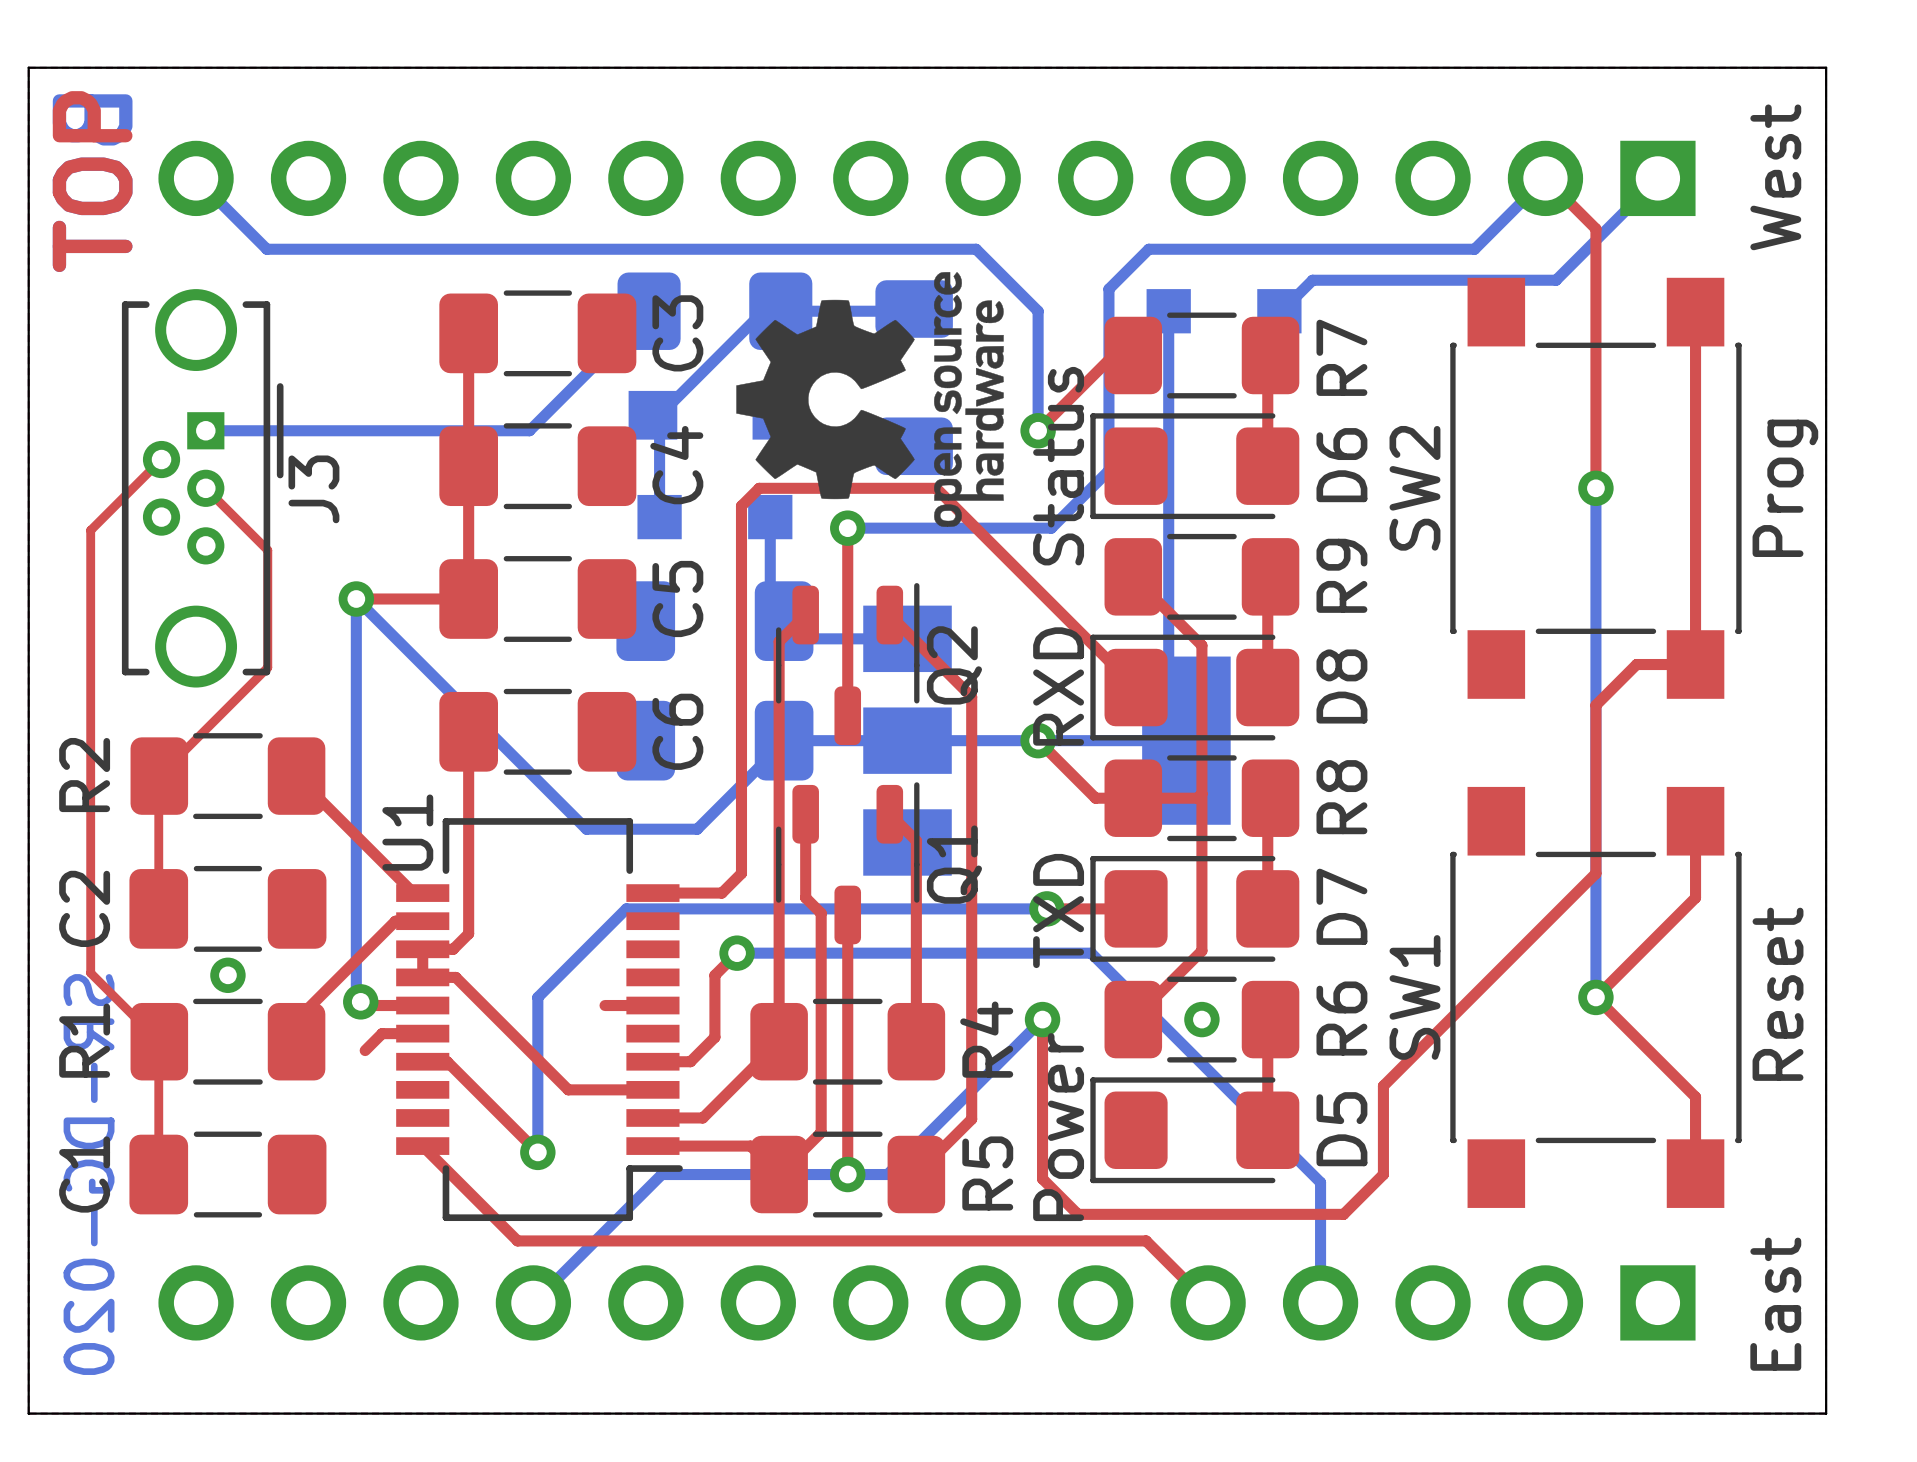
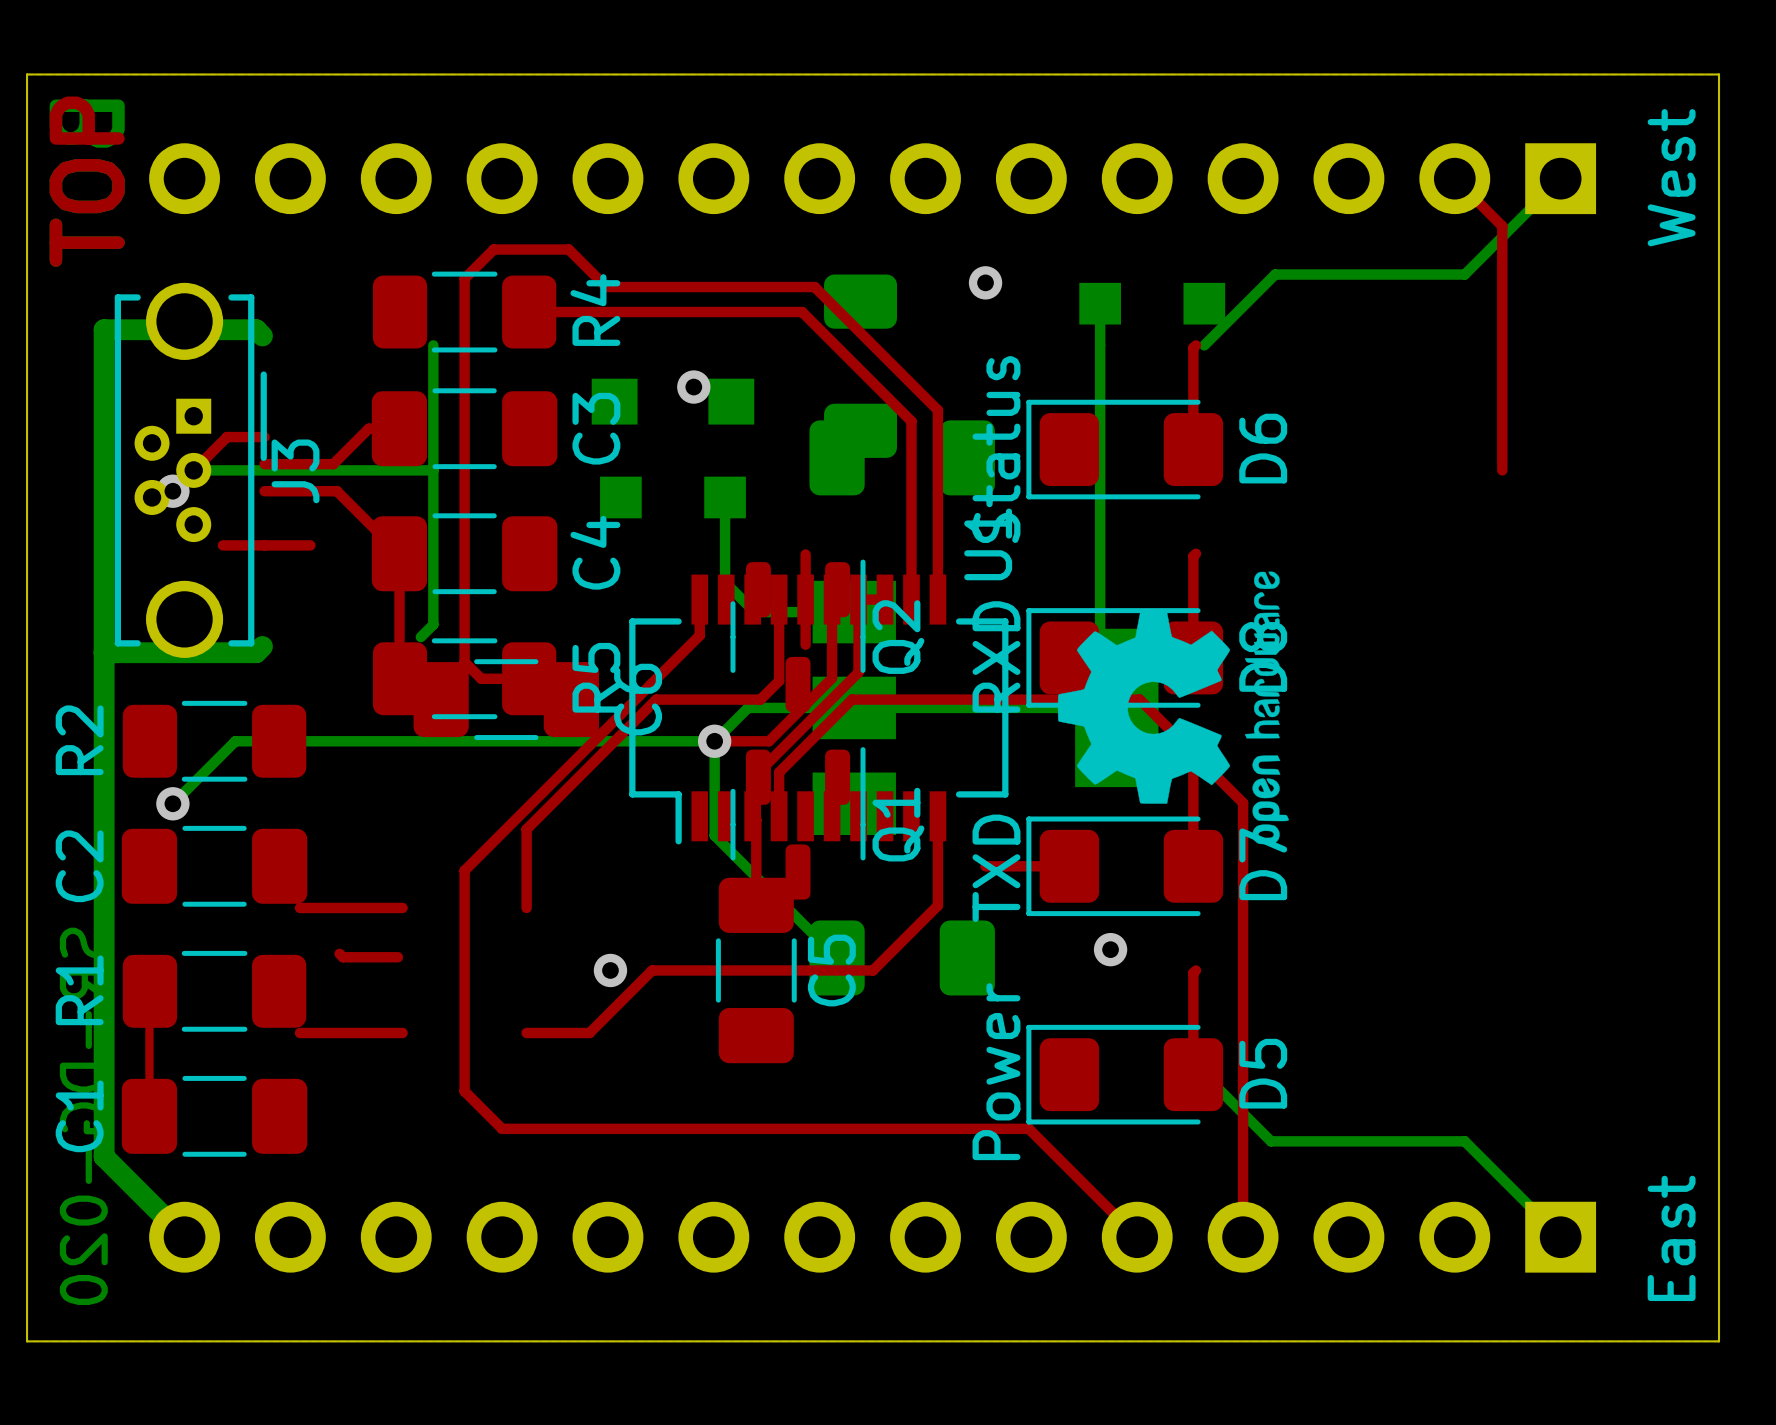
bottom track: (196, 178) (266, 249) (976, 249) (1038, 311) (1038, 430) -> none
bottom track: (1545, 178) (1474, 249) (1148, 249) (1108, 289) (1108, 470) (1051, 528) (847, 528) -> none
drawing: [736, 272, 1004, 527] -> none
bottom track: (1354, 280) (1312, 280) (1281, 311) (1279, 311) -> (1275, 274) (1204, 345)
bottom track: (649, 311) (529, 430) (205, 430) -> none
part: (714, 311) -> none
bottom track: (911, 311) (763, 311) (659, 415) (659, 517) -> none
top track: (1695, 312) (1695, 664) (1636, 664) (1595, 705) (1595, 873) (1383, 1085) (1383, 1174) (1343, 1214) (1077, 1214) (1042, 1178) (1042, 1019) -> none
top track: none -> (529, 312) (802, 312) (911, 421) (911, 599)
top track: (468, 333) (468, 598) (356, 598) -> none
C3 position: (537, 333) -> (464, 428)
bottom track: none -> (262, 335) (256, 329) (104, 329) (104, 1156) (184, 1237)
bottom track: none -> (433, 345) (433, 624) (420, 637)
top track: (1133, 355) (1113, 355) (1038, 430) -> none
R7: (1201, 355) -> none
via: none -> (693, 387)
via position: (1038, 430) -> (985, 282)
top track: none -> (399, 428) (368, 428) (333, 464) (264, 464)
top track: none -> (264, 437) (227, 437) (172, 491)
top track: (161, 459) (90, 530) (90, 973) (159, 1041) -> none
C4 position: (537, 466) -> (464, 553)
part: none -> (902, 457)
top track: (205, 488) (267, 550) (267, 667) (158, 776) (158, 908) -> none
bottom track: none -> (433, 470) (193, 470) (172, 491)
bottom track: (1595, 488) (1595, 997) -> none
SW2: Prog (1595, 488) -> none
via: (1595, 488) -> none
via: none -> (172, 491)
top track: none -> (264, 491) (336, 491) (399, 553) (399, 678)
top track: (847, 528) (847, 715) -> none
via: (847, 528) -> none
top track: none -> (222, 545) (310, 545)
top track: (1133, 576) (1201, 645) (1201, 950) (1133, 1019) -> none
R9: (1201, 576) -> none
top track: none -> (805, 554) (805, 644)
drawing: none -> [1057, 571, 1289, 845]
via: (356, 598) -> none
C5 rotation: 0° (537, 598) -> 90° clockwise (756, 970)
C5 position: (537, 598) -> (756, 970)
top track: (805, 615) (779, 641) (779, 1041) (702, 1117) (652, 1117) -> none
top track: (889, 615) (971, 696) (971, 1119) (916, 1174) -> none
part: (714, 621) -> none
top track: none -> (779, 599) (779, 680) (760, 699) (656, 699) (526, 829) (526, 907)
top track: none -> (832, 599) (832, 678) (769, 741) (714, 741)
top track: none -> (885, 599) (858, 599) (858, 672) (752, 778) (752, 816) (756, 819) (756, 905)
top track: none -> (937, 599) (937, 410) (814, 287) (606, 287) (568, 249) (493, 249) (464, 278) (464, 662) (481, 678) (529, 678)
bottom track: none -> (262, 646) (256, 652) (104, 652)
top track: (1135, 687) (936, 488) (759, 488) (741, 506) (741, 873) (721, 893) (652, 893) -> none
top track: (468, 731) (468, 933) (453, 949) (422, 949) (422, 977) (455, 977) (568, 1089) (652, 1089) -> none
part: (714, 740) -> none
bottom track: (794, 740) (784, 740) (697, 829) (586, 829) (356, 598) (356, 997) (360, 1001) -> (747, 707) (714, 741)
top track: (1038, 740) (1095, 798) (1197, 798) (1201, 793) -> none
via: (1038, 740) -> none
top track: (296, 776) (413, 893) (422, 893) -> none
bottom track: none -> (714, 741) (714, 835) (837, 957)
bottom track: none -> (714, 741) (235, 741) (172, 803)
via: none -> (714, 741)
R8: (1201, 798) -> none
top track: (805, 814) (805, 897) (821, 913) (821, 1132) (779, 1174) (750, 1146) (652, 1146) -> none
top track: (889, 814) (916, 840) (916, 1041) -> none
top track: (1695, 821) (1695, 897) (1595, 997) (1695, 1097) (1695, 1173) -> none
via: none -> (172, 803)
top track: none -> (779, 816) (779, 772) (851, 699) (1139, 699) (1243, 802) (1243, 1237)
top track: none -> (937, 816) (937, 905) (873, 970) (652, 970) (589, 1032) (526, 1032)
bottom track: (1046, 908) (626, 908) (537, 997) (537, 1152) -> none
via: (1046, 908) -> none
top track: (847, 914) (847, 1174) -> none
top track: (422, 921) (395, 921) (296, 1020) (296, 1041) -> none
top track: none -> (300, 907) (402, 907)
top track: (737, 953) (714, 975) (714, 1037) (690, 1061) (652, 1061) -> none
bottom track: (737, 953) (1091, 953) (1320, 1182) (1320, 1302) -> none
via: (737, 953) -> none
via: (227, 975) -> none
SW1: Reset (1595, 997) -> none
via: (1595, 997) -> none
via: (360, 1001) -> none
top track: (605, 1005) (652, 1005) -> none
part: none -> (902, 957)
U1 rotation: 0° (539, 1019) -> 90° clockwise (818, 709)
U1 position: (539, 1019) -> (818, 709)
via: none -> (610, 970)
bottom track: (1042, 1019) (887, 1174) (661, 1174) (537, 1298) -> none
via: (1042, 1019) -> none
R6: (1201, 1019) -> none
via position: (1201, 1019) -> (1110, 949)
top track: (422, 1033) (382, 1033) (365, 1050) -> none
R4 position: (847, 1041) -> (464, 312)
top track: (422, 1061) (447, 1061) (537, 1152) -> none
top track: none -> (300, 1032) (402, 1032)
bottom track: none -> (1204, 1074) (1271, 1141) (1464, 1141) (1560, 1237)
top track: (422, 1146) (517, 1240) (1146, 1240) -> (699, 599) (699, 635) (464, 870) (464, 1091) (502, 1128) (1028, 1128) (1078, 1178)
via: (537, 1152) -> none
R5 position: (847, 1174) -> (464, 678)
via: (847, 1174) -> none

